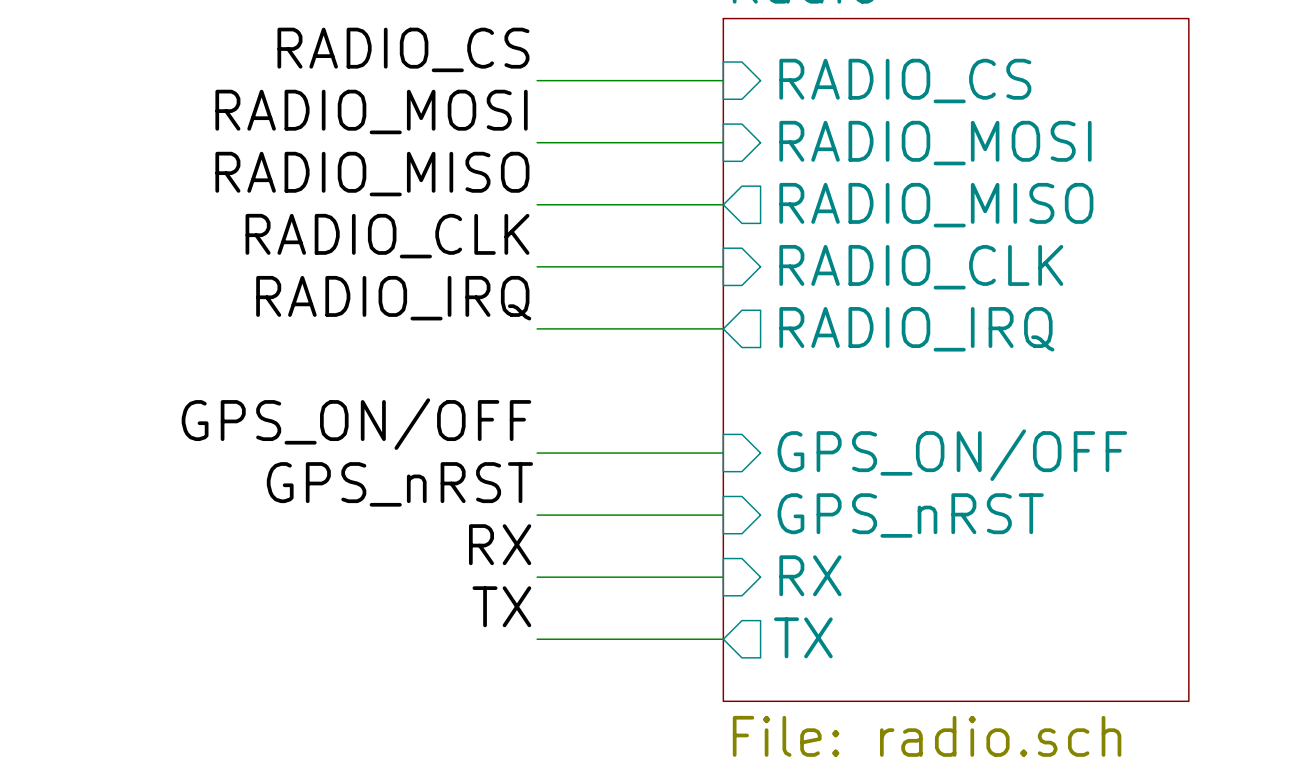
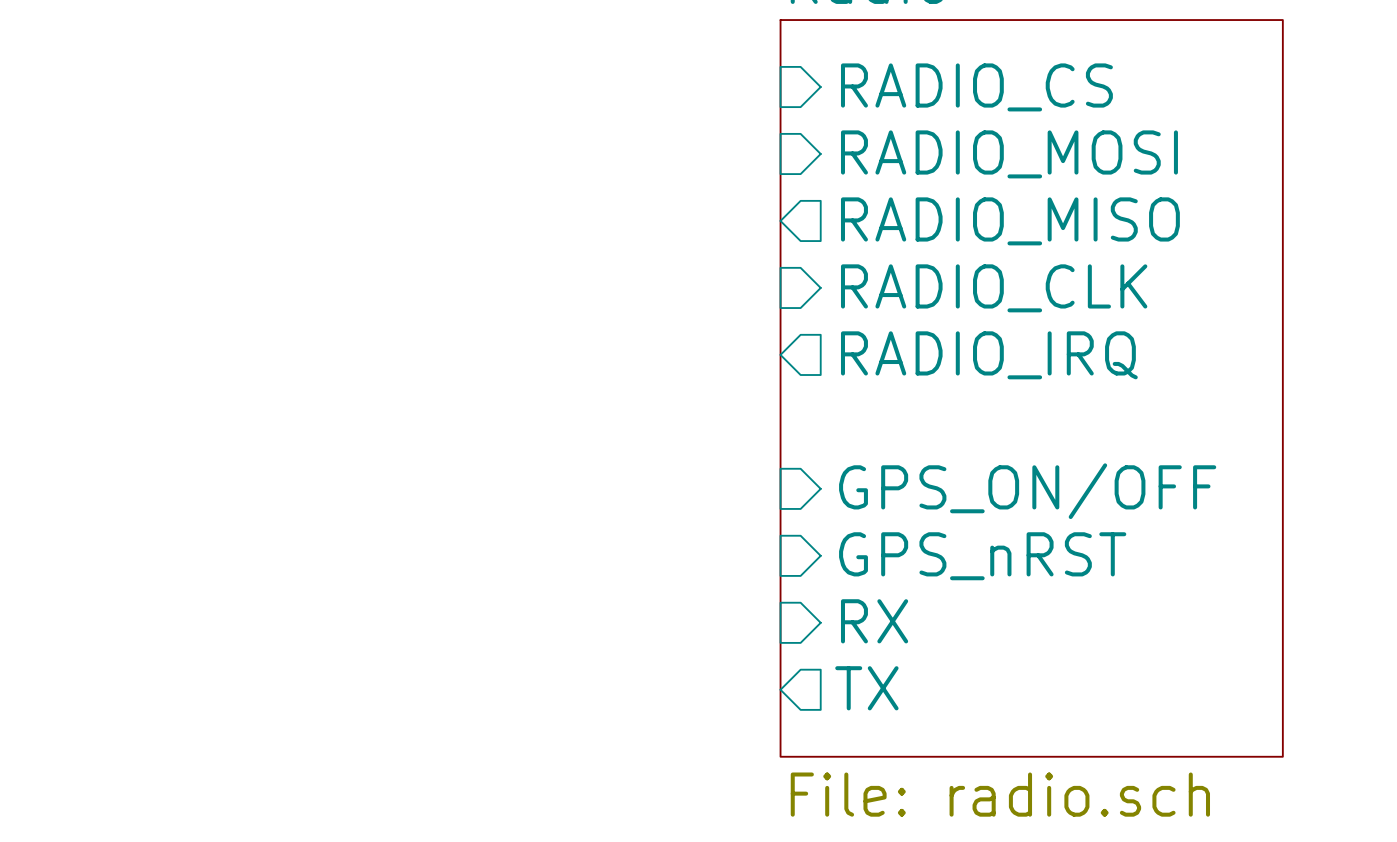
label: RADIO_CS (403, 49) -> none
wire: (537, 80) (723, 80) -> none
label: RADIO_MOSI (371, 111) -> none
wire: (537, 142) (723, 142) -> none
label: RADIO_MISO (372, 174) -> none
wire: (537, 204) (723, 204) -> none
label: RADIO_CLK (387, 236) -> none
wire: (537, 266) (723, 266) -> none
label: RADIO_IRQ (393, 298) -> none
wire: (537, 328) (723, 328) -> none
label: GPS_ON/OFF (356, 424) -> none
wire: (537, 453) (723, 453) -> none
label: GPS_nRST (399, 484) -> none
wire: (537, 515) (723, 515) -> none
label: RX (500, 544) -> none
wire: (537, 577) (723, 577) -> none
label: TX (501, 606) -> none
wire: (537, 639) (723, 639) -> none

